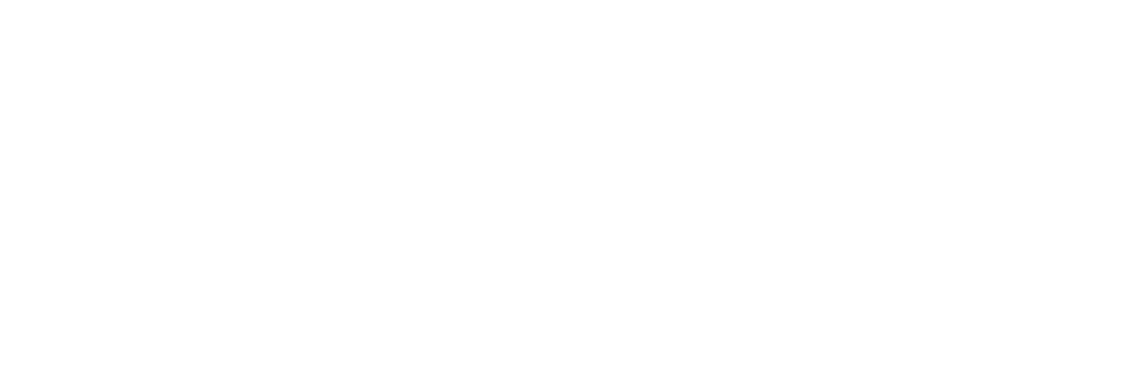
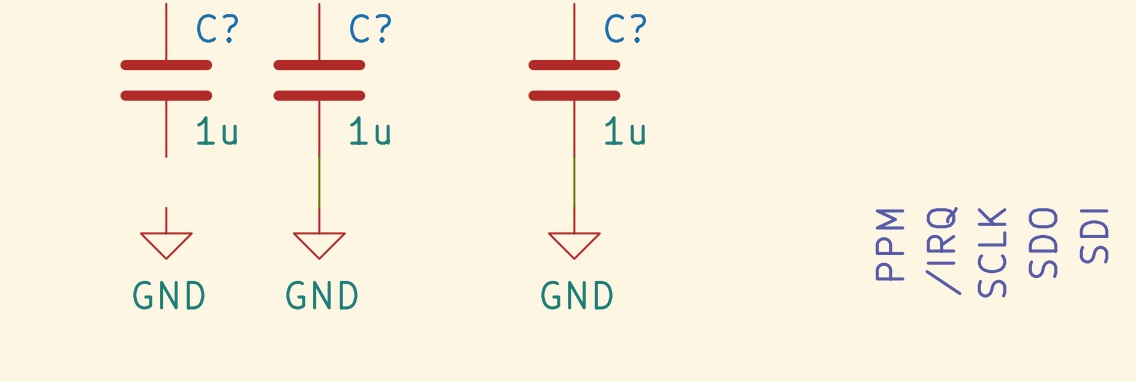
C?: none -> 1u (166, 80)
C?: none -> 1u (319, 80)
C?: none -> 1u (574, 80)
wire: none -> (319, 156) (319, 207)
wire: none -> (574, 156) (574, 207)
power symbol: none -> GND (166, 233)
power symbol: none -> GND (319, 233)
power symbol: none -> GND (574, 233)
text: none -> PPM (890, 244)
text: none -> SDO (1043, 243)
text: none -> SDI (1094, 236)
text: none -> /IRQ (943, 251)
text: none -> SCLK (992, 252)

